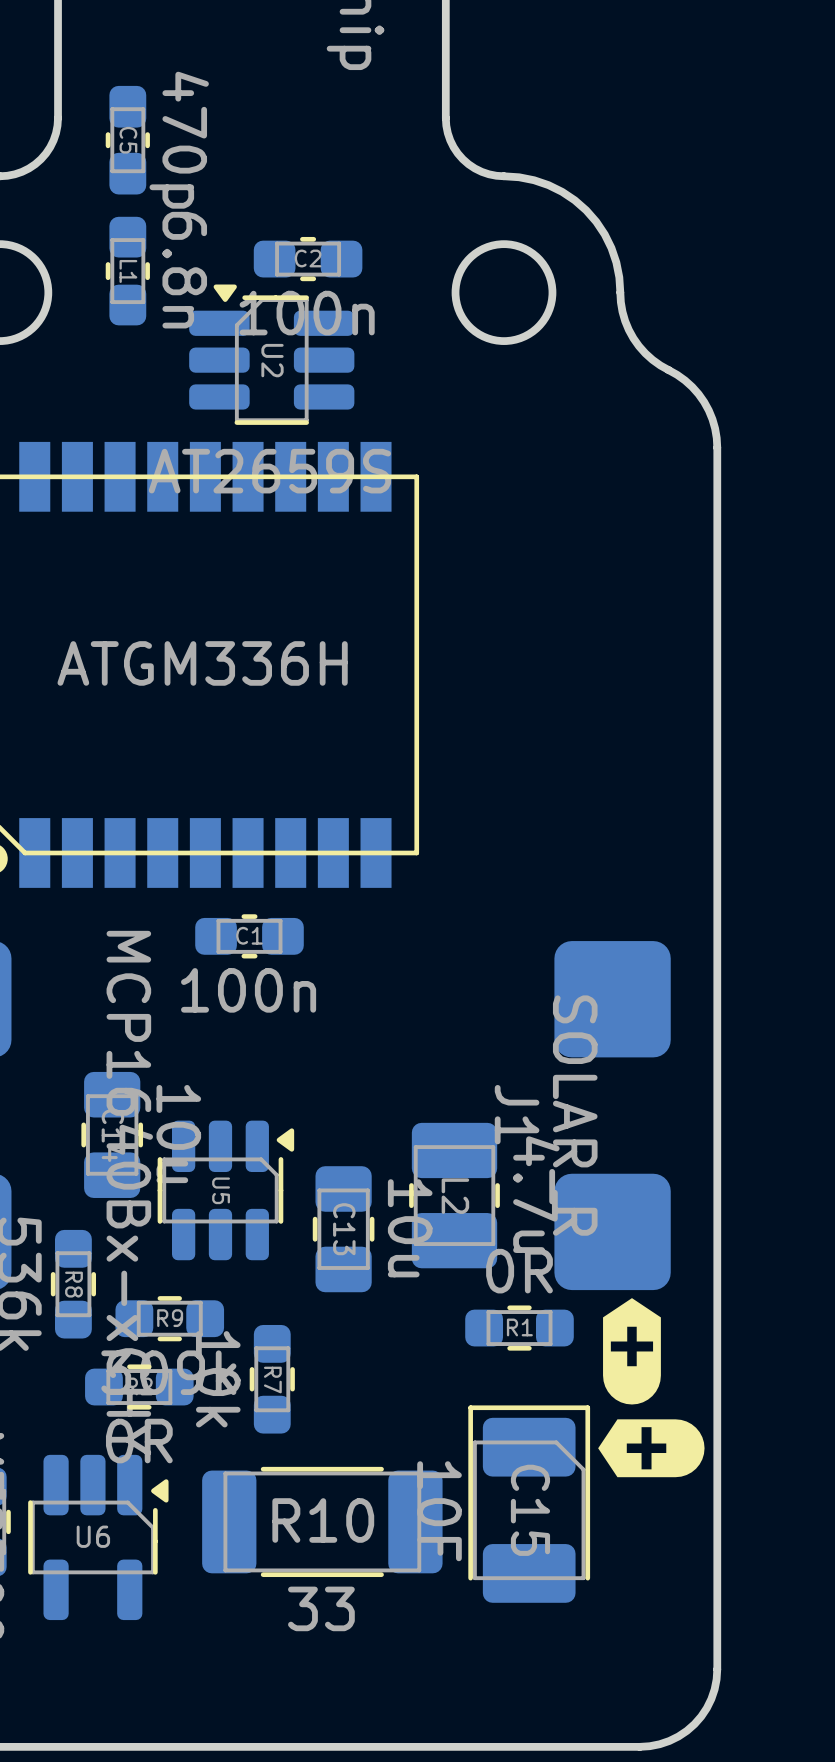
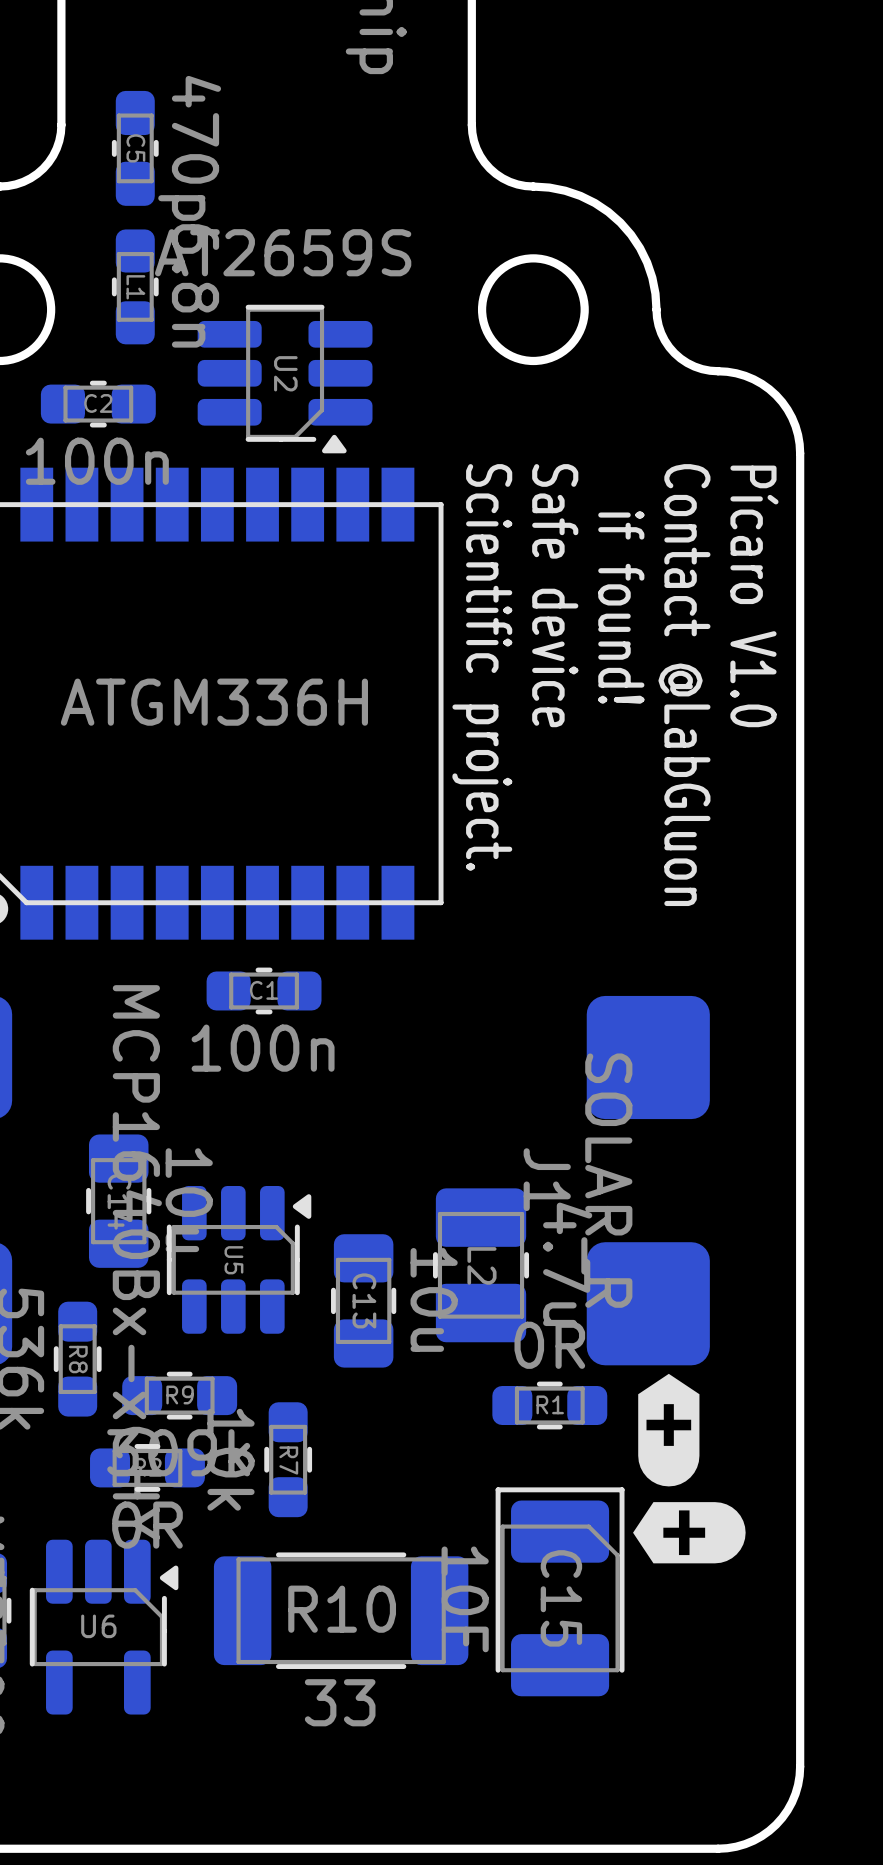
C2 position: (308, 259) -> (98, 404)
board edge: (620, 292) (625, 320) (639, 346) (652, 359) (685, 380) (704, 402) (712, 419) (717, 447) (717, 1669) (711, 1698) (694, 1724) (669, 1740) (639, 1746) -> (656, 309) (658, 325) (664, 340) (680, 358) (702, 369) (745, 375) (761, 383) (776, 395) (792, 417) (798, 435) (800, 453) (799, 1775) (795, 1793) (787, 1810) (776, 1824) (761, 1836) (745, 1844) (727, 1848) (677, 1848)
U2 rotation: 0° (271, 354) -> 180° (285, 379)
text: none -> Safe device (555, 595)
text: none -> Pícaro V1.0 (754, 596)
text: none -> if found! (621, 607)
text: none -> Scientific project. (482, 667)
text: none -> Contact @LabGluon (684, 685)

